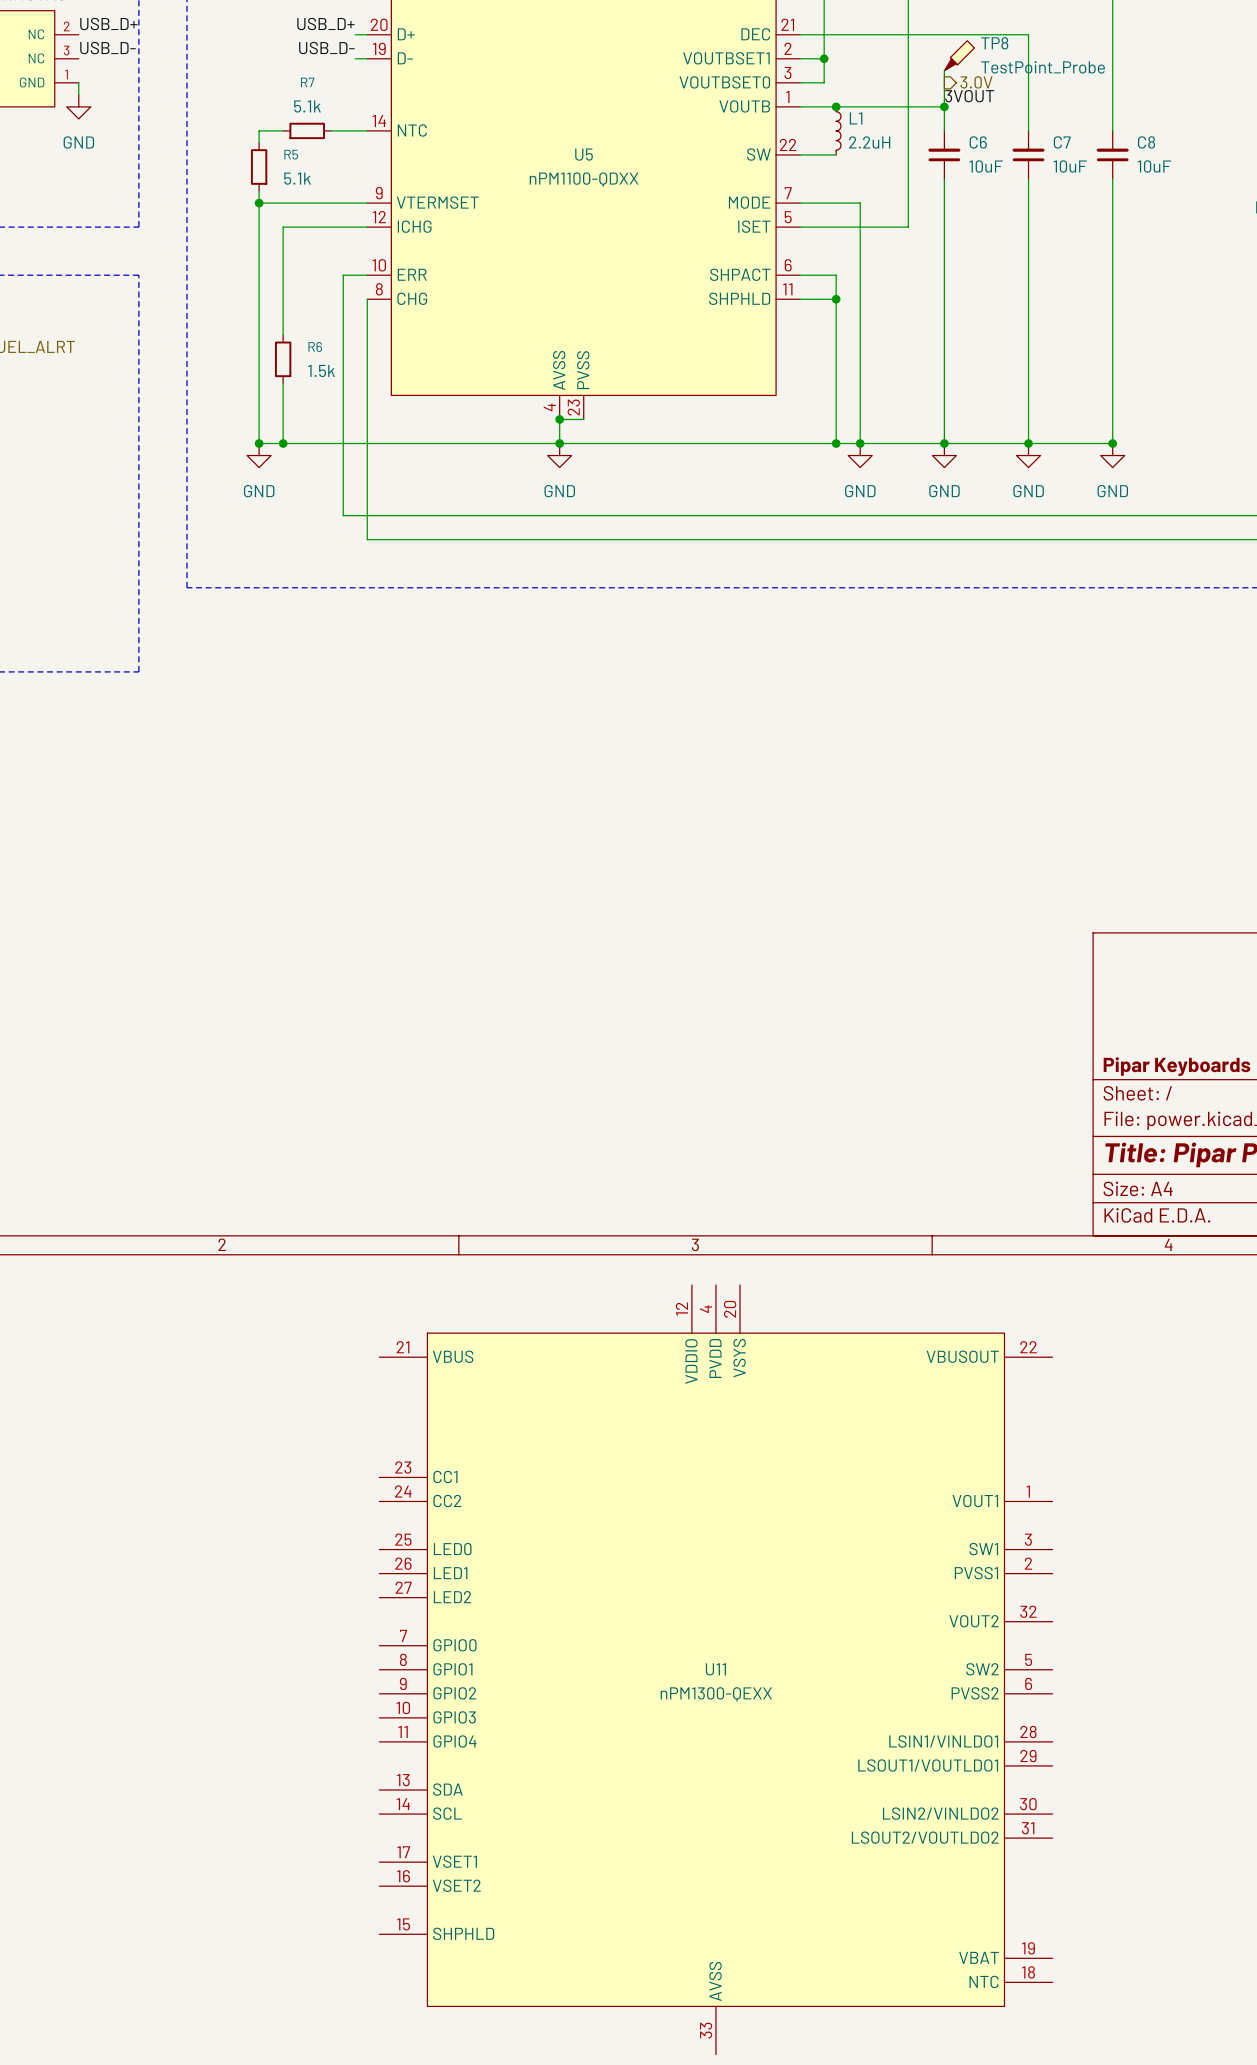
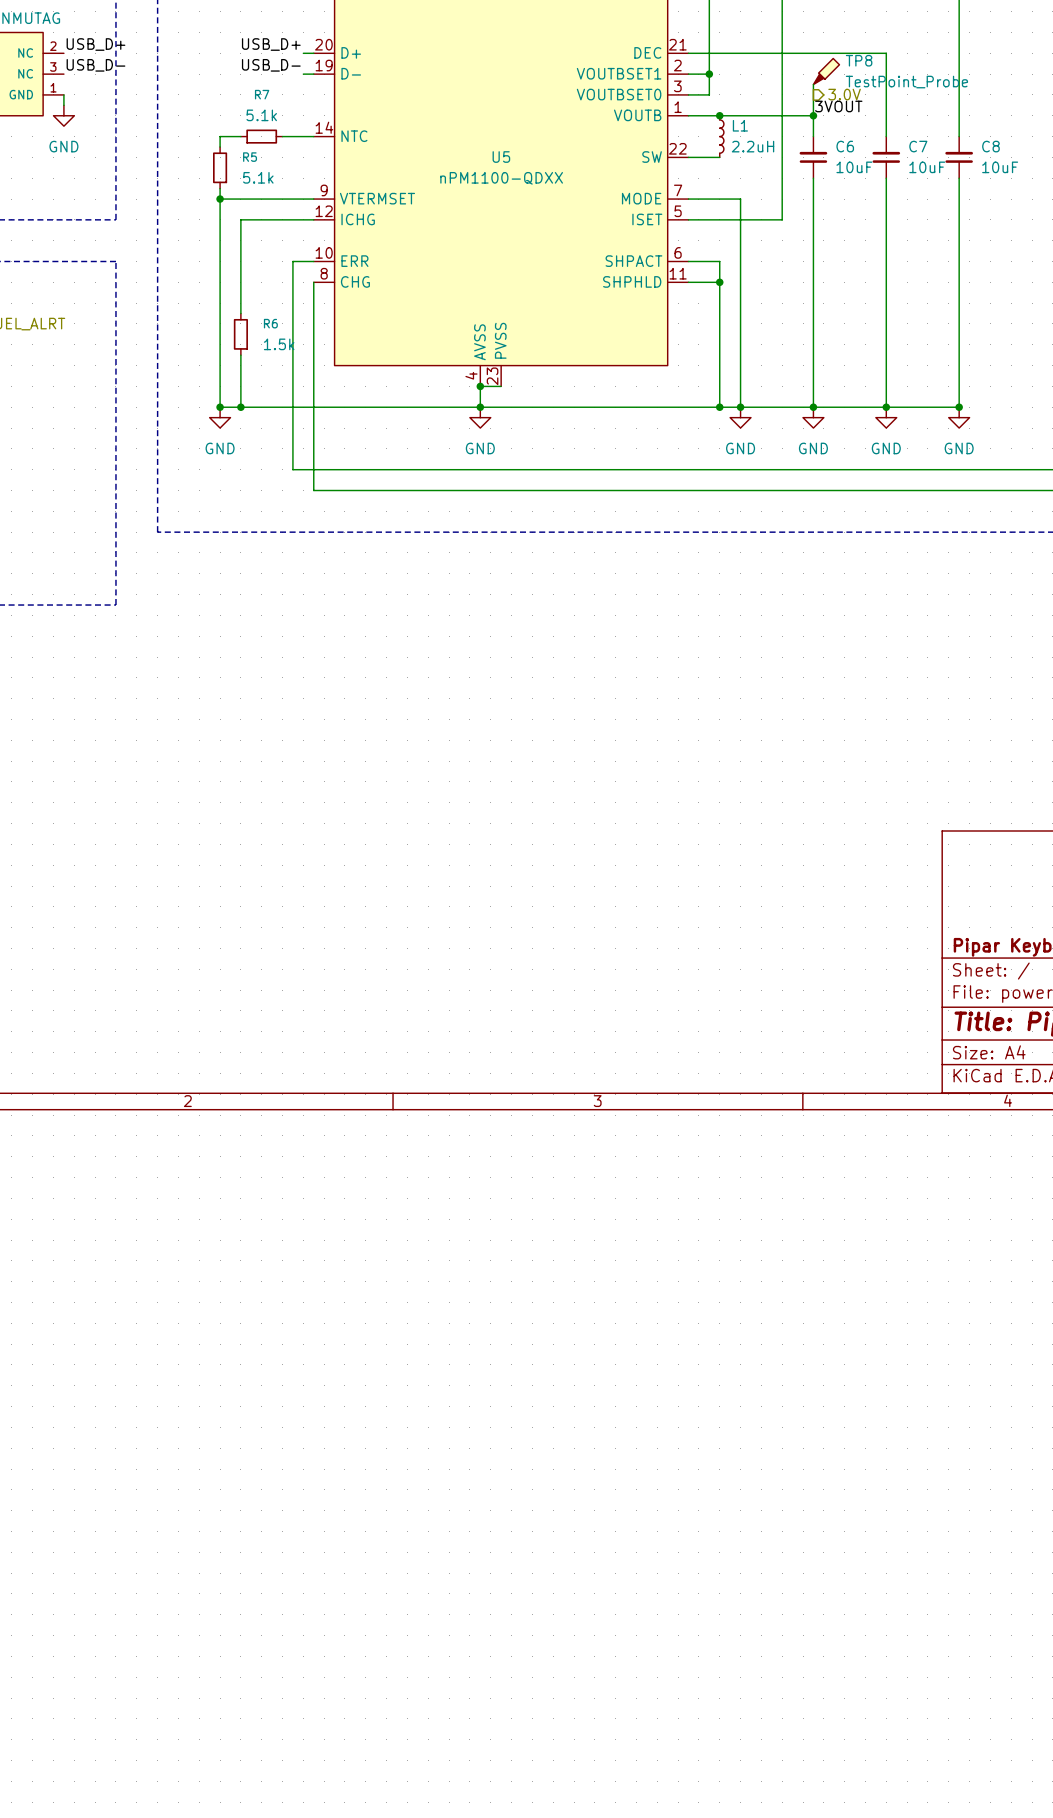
U11: nPM1300-QEXX (715, 1669) -> none

